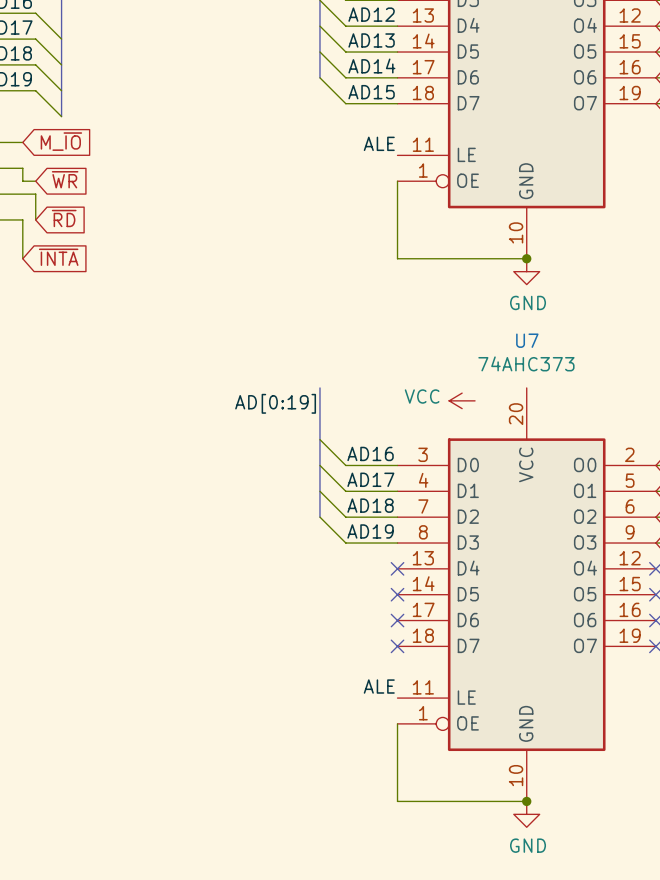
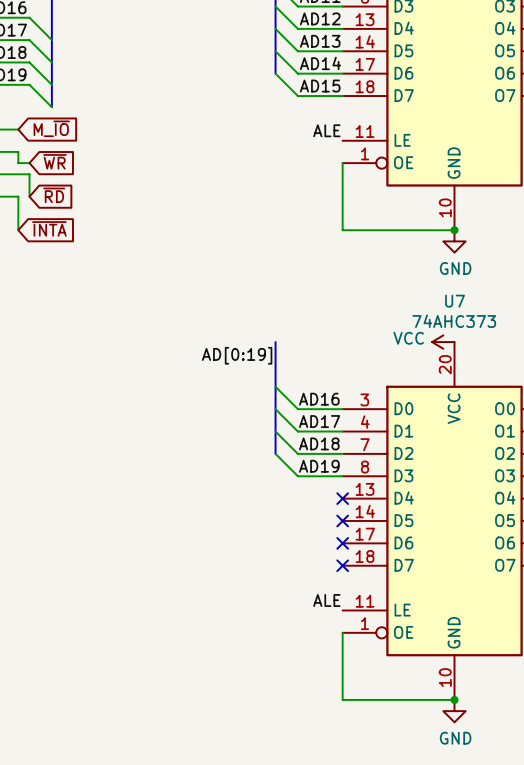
power symbol position: VCC (462, 400) -> VCC (443, 342)

